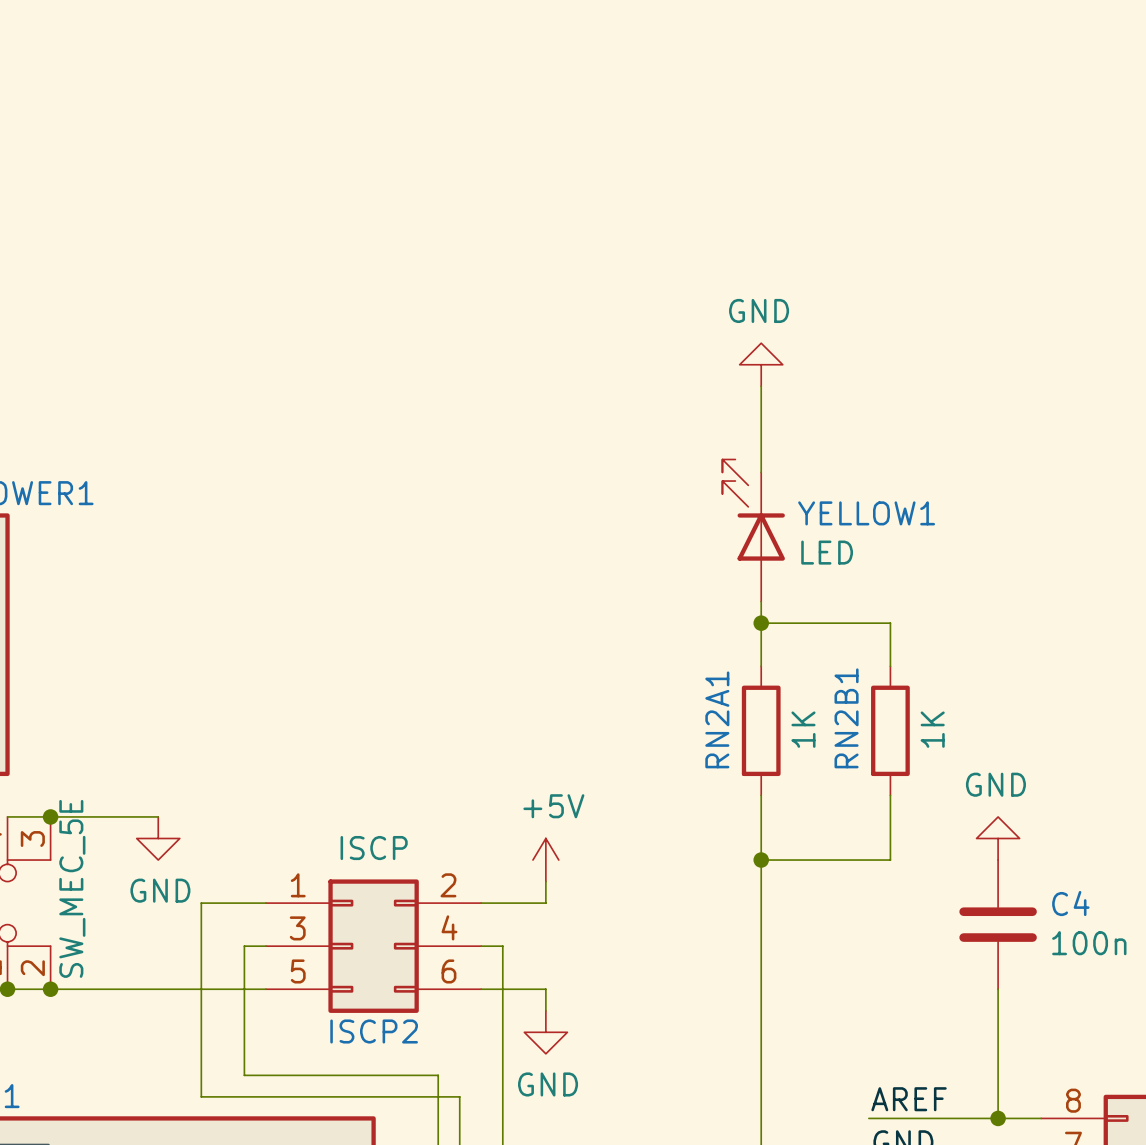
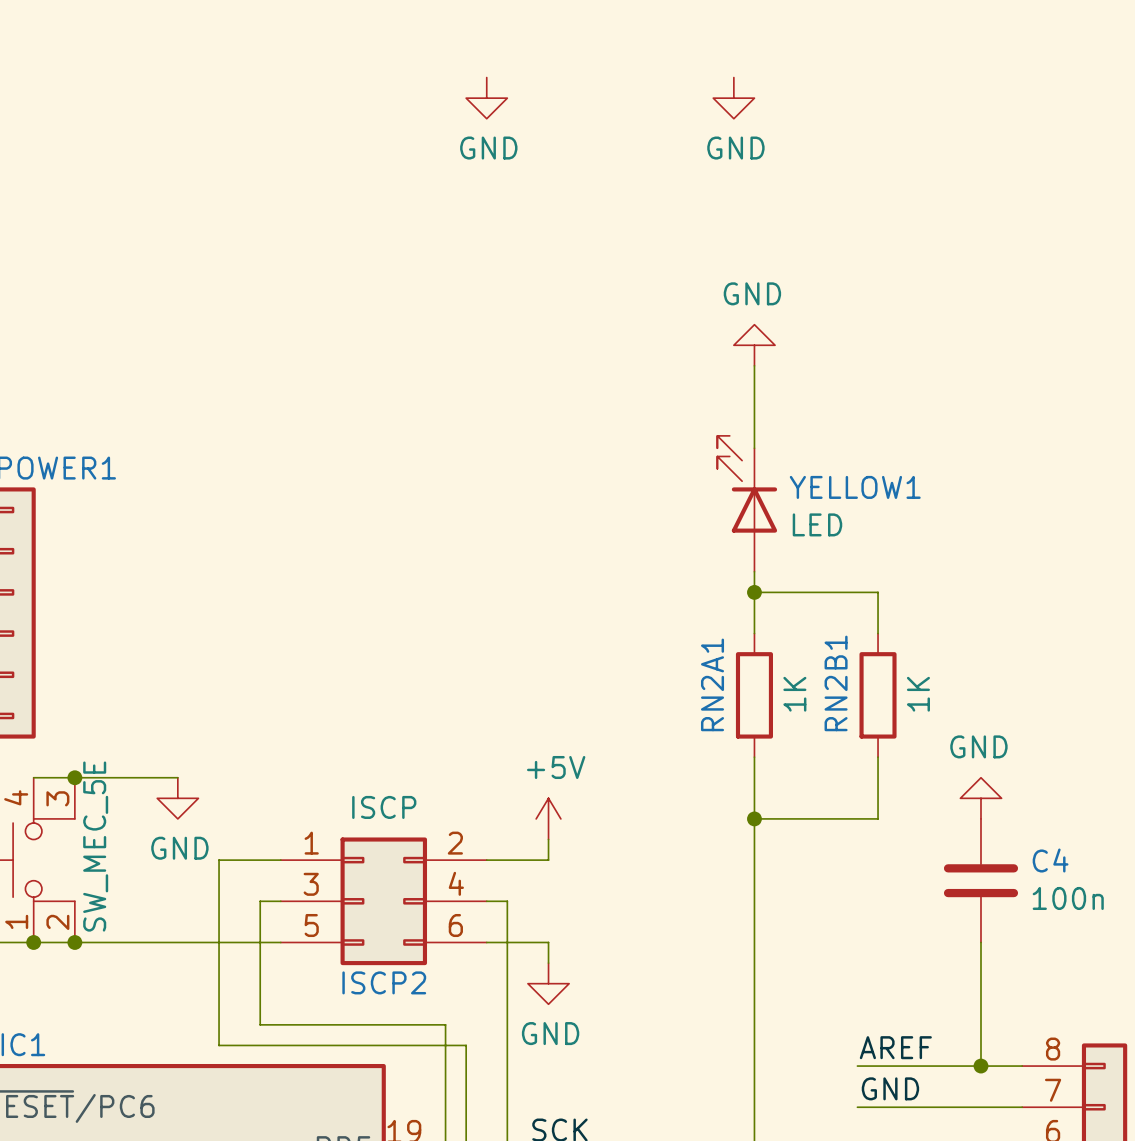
power symbol: none -> GND (486, 98)
power symbol: none -> GND (733, 98)

